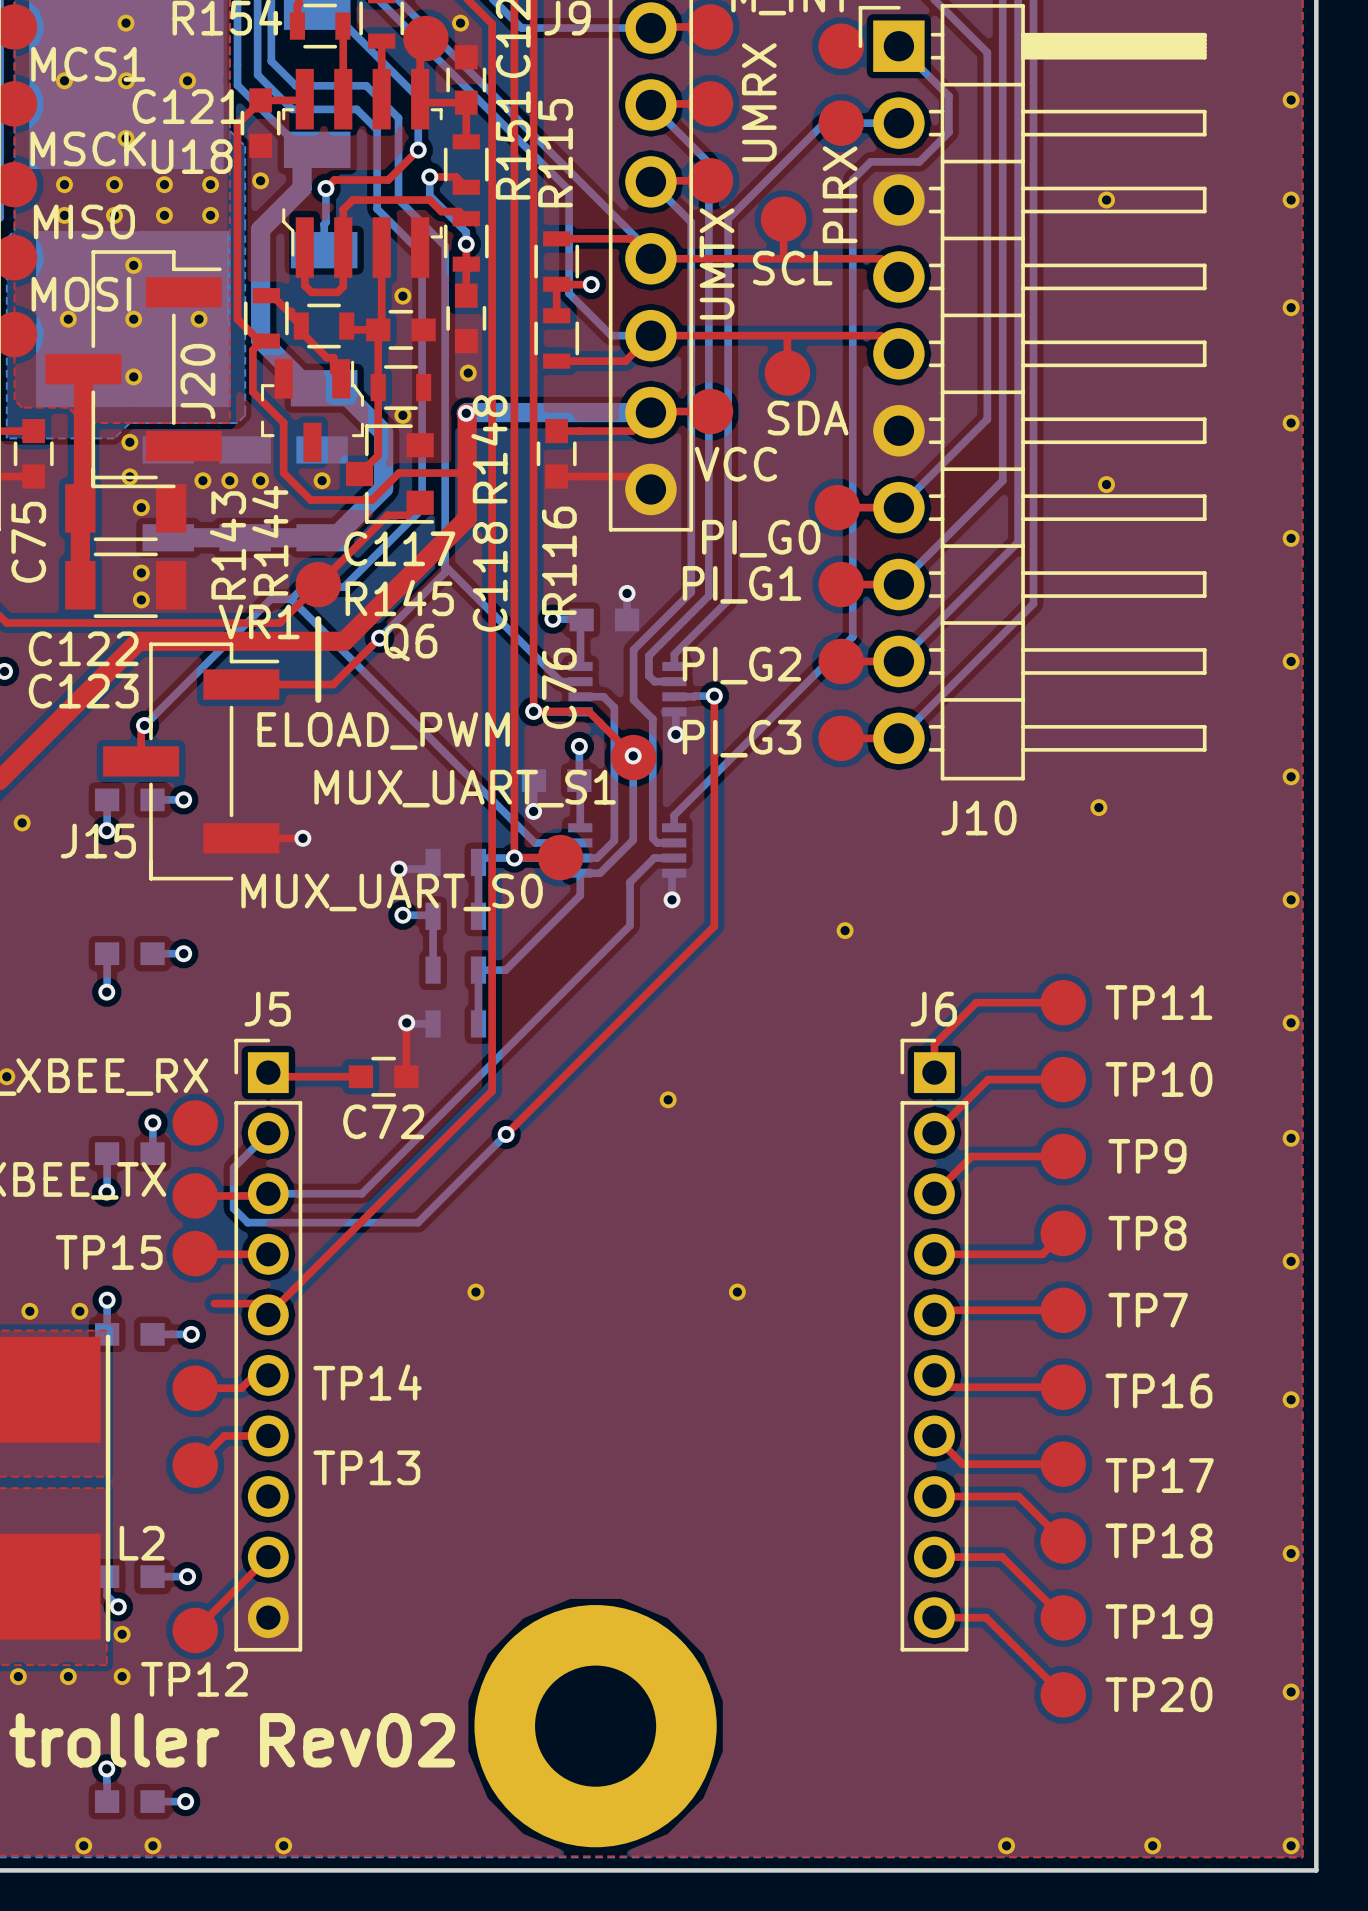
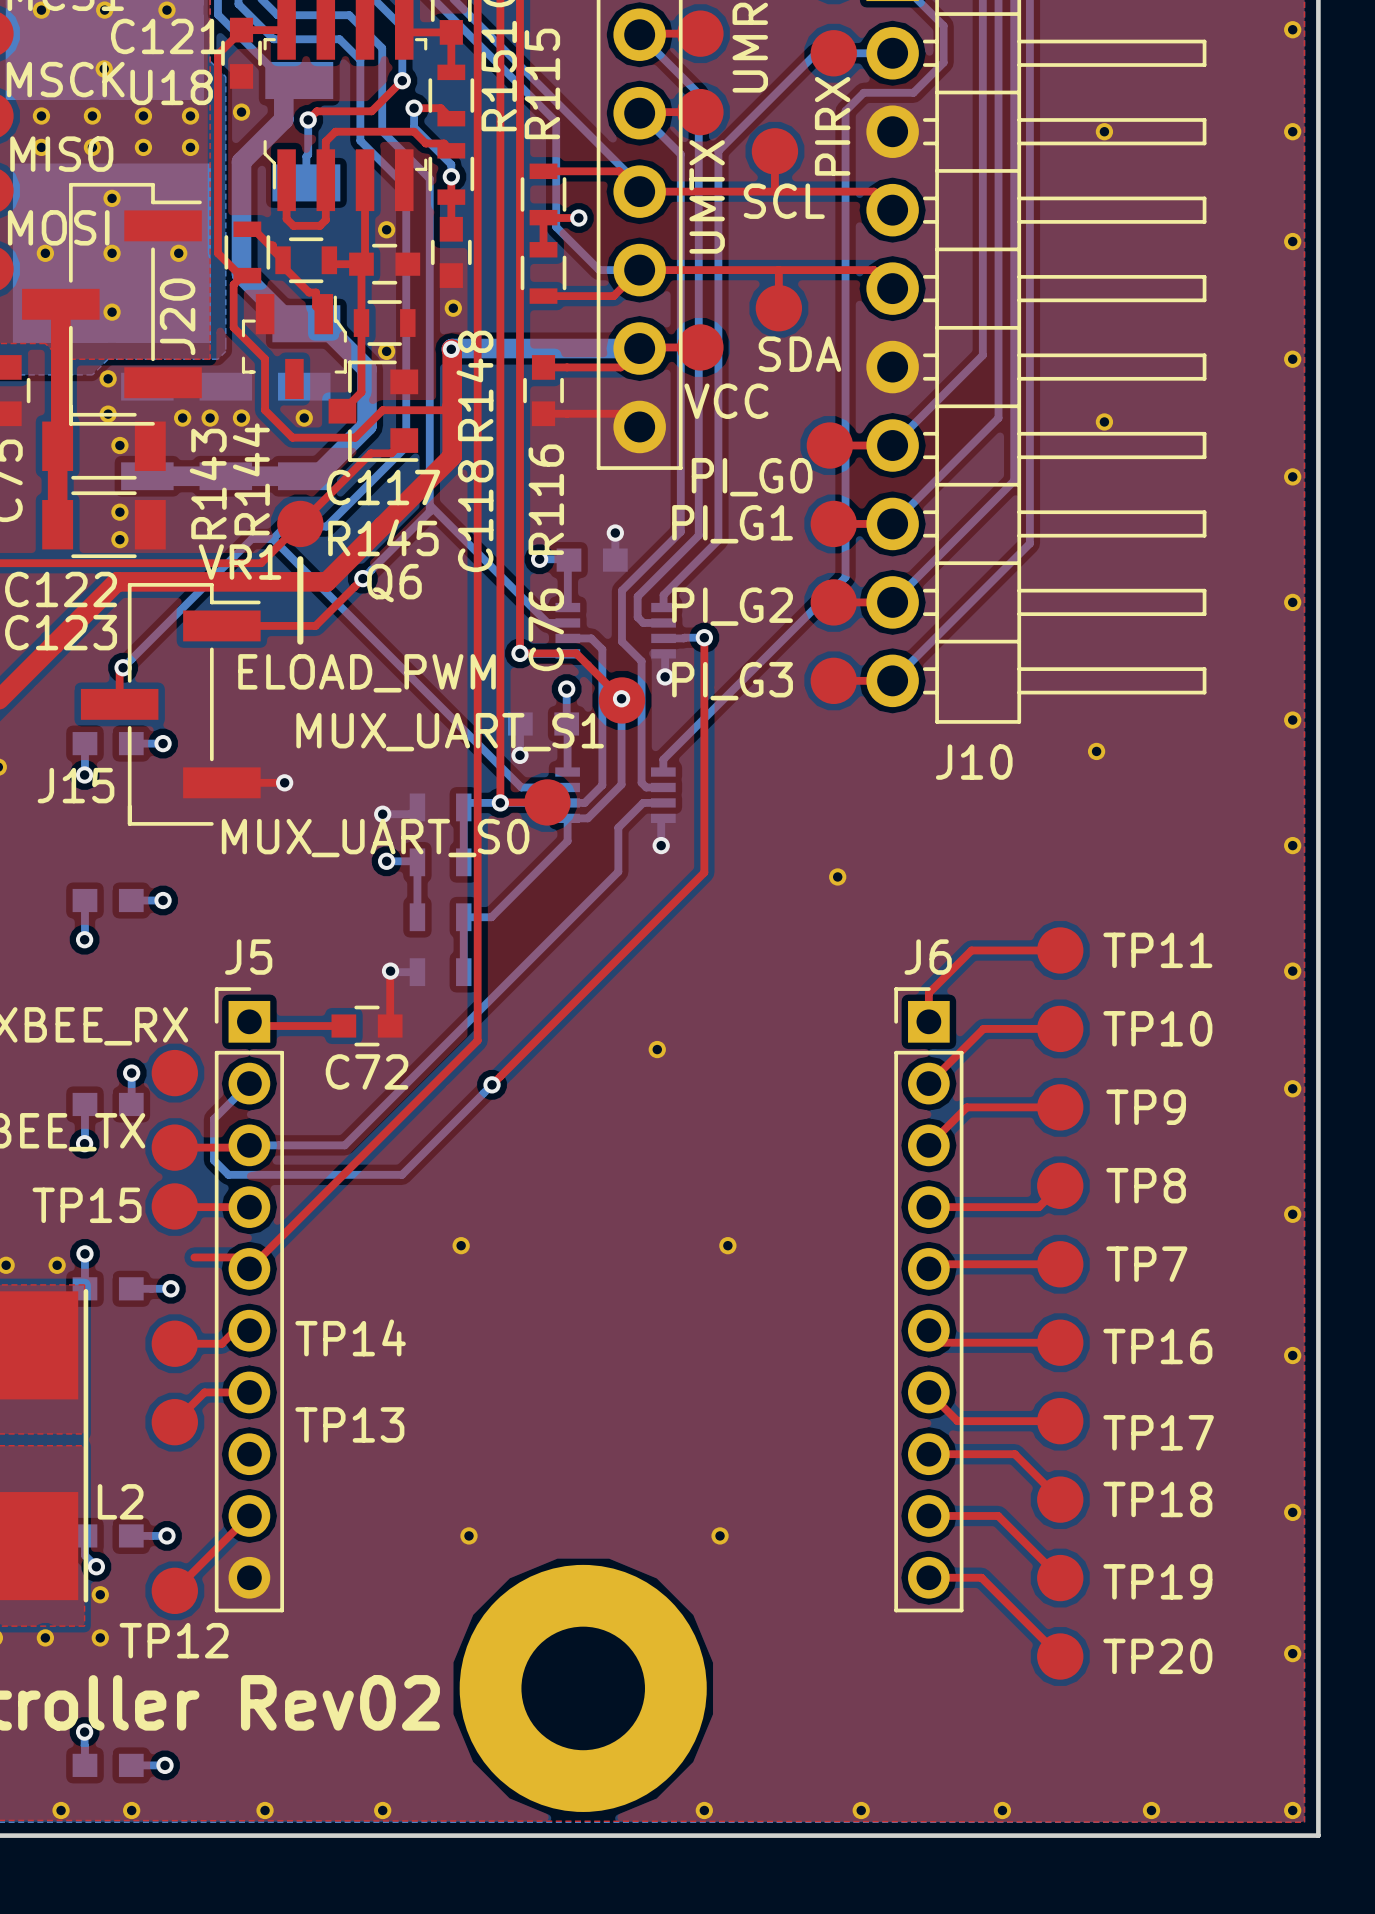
part: none -> (469, 1535)
part: none -> (720, 1535)
part: none -> (382, 1810)
part: none -> (704, 1810)
part: none -> (861, 1810)

